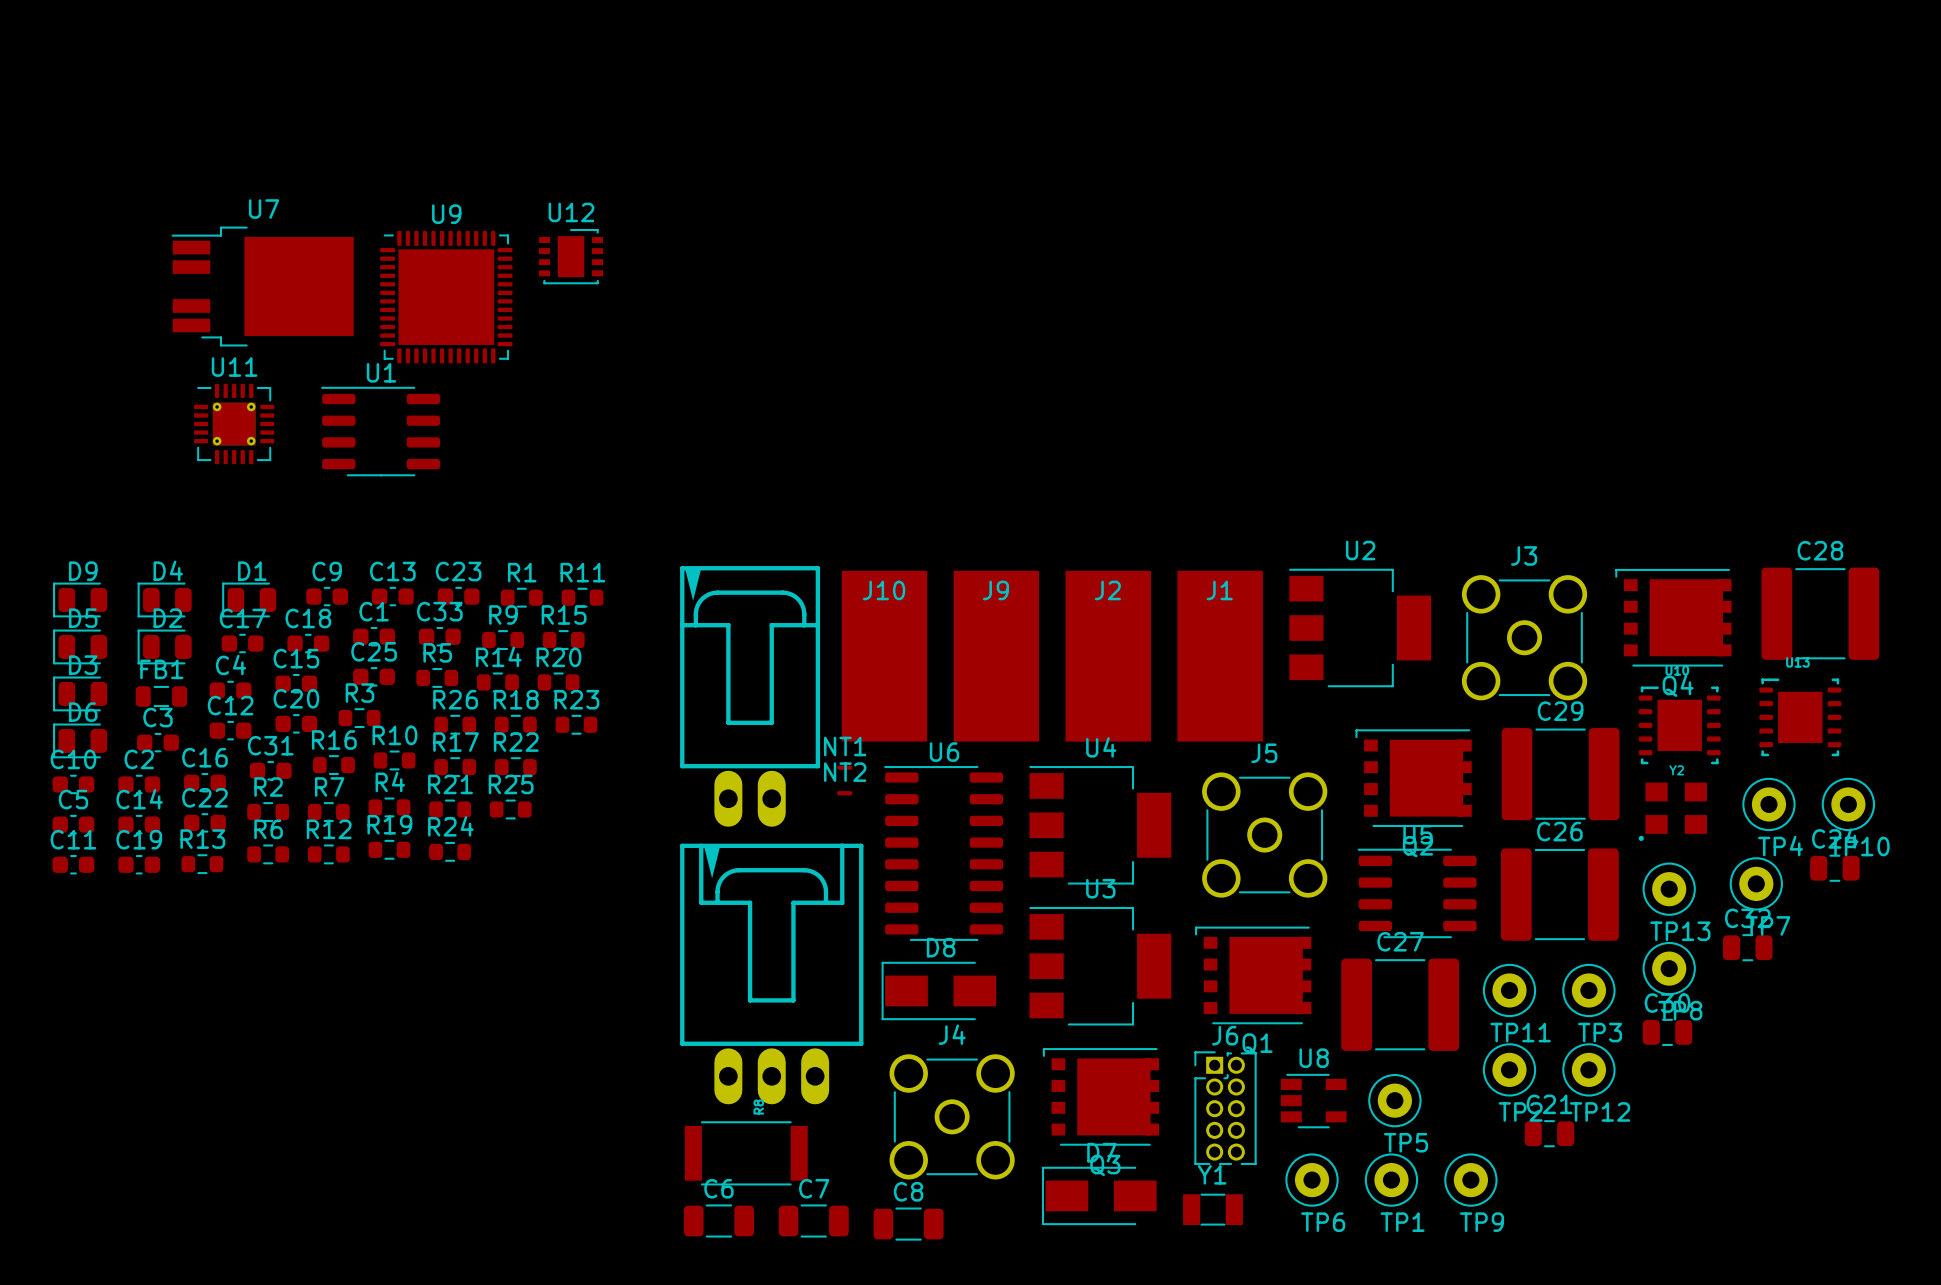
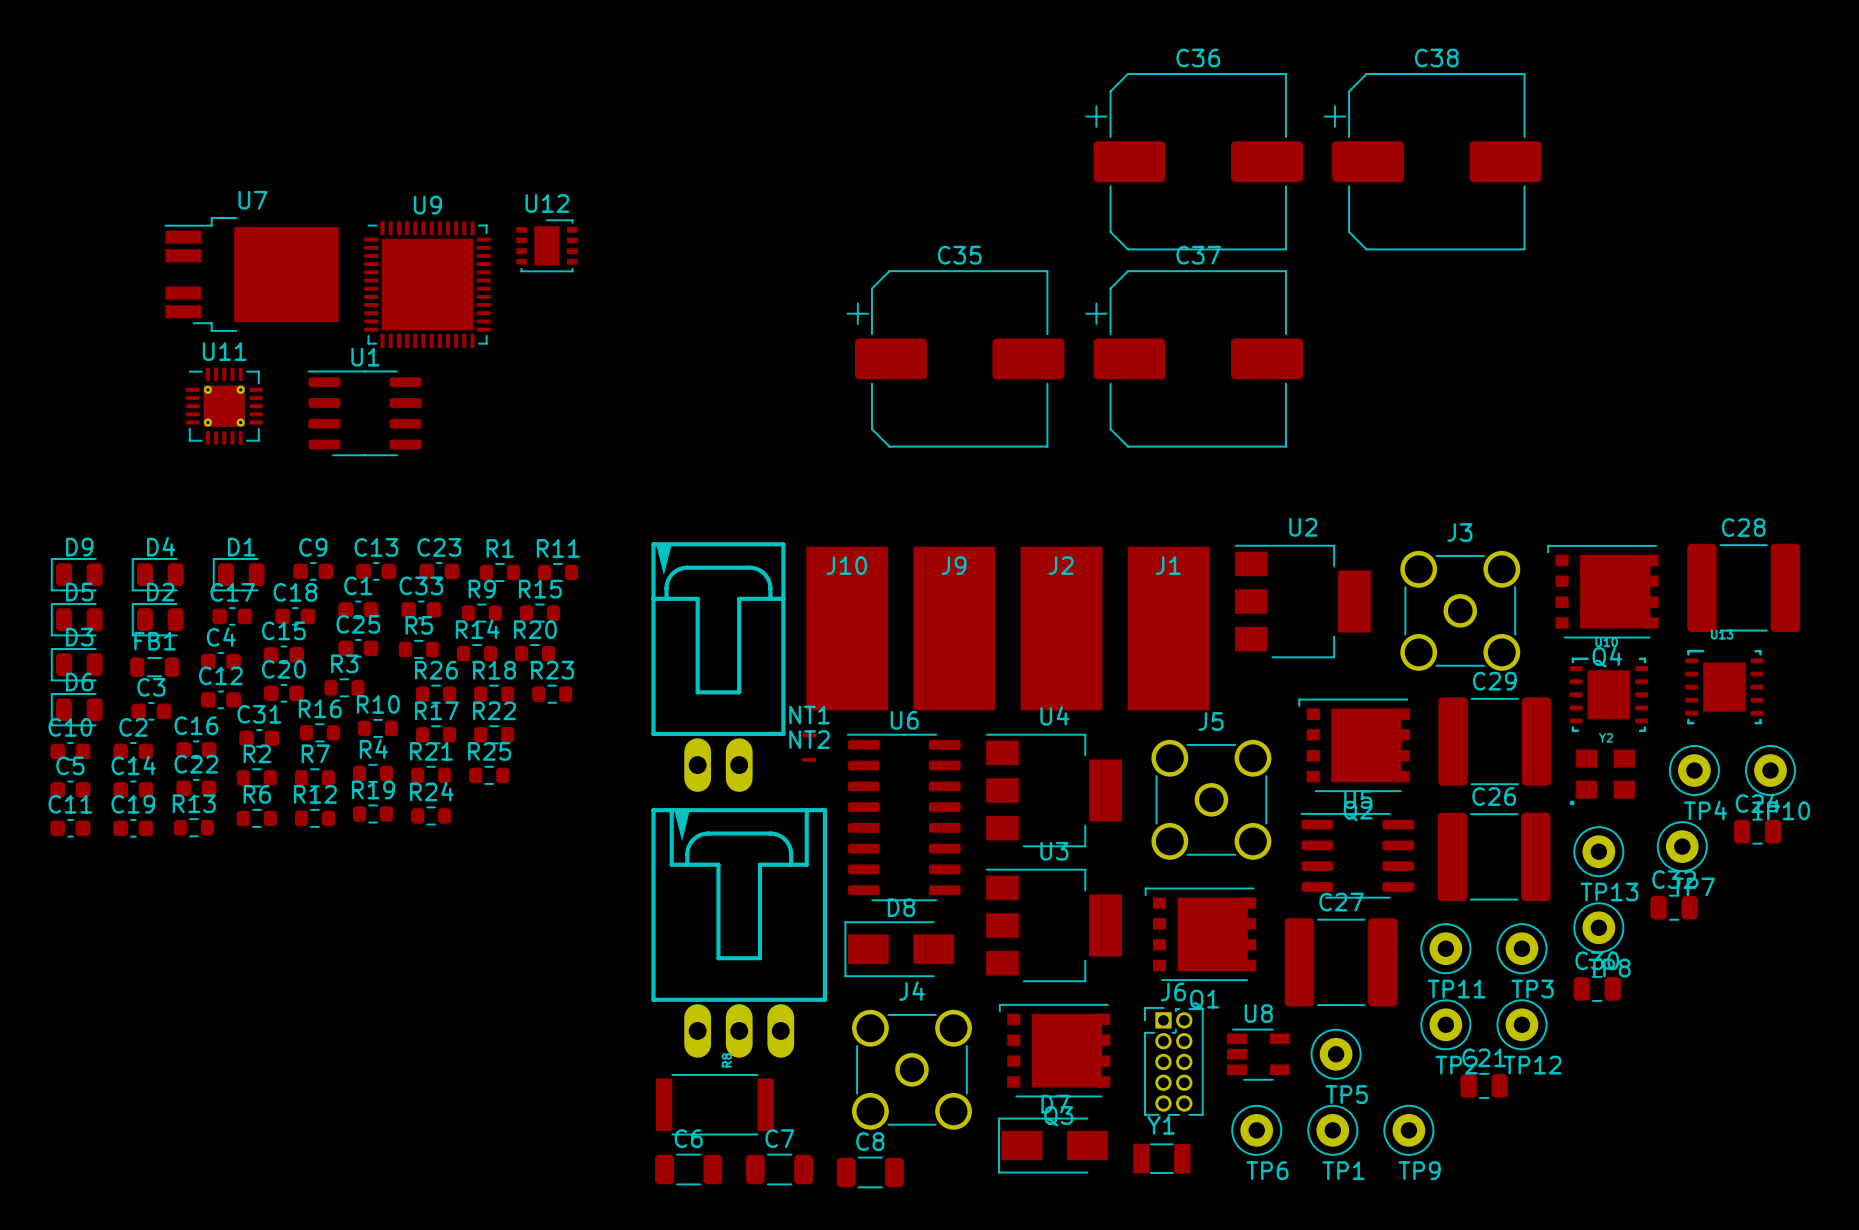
C36: none -> (1194, 161)
C38: none -> (1432, 161)
C35: none -> (955, 358)
C37: none -> (1194, 358)

